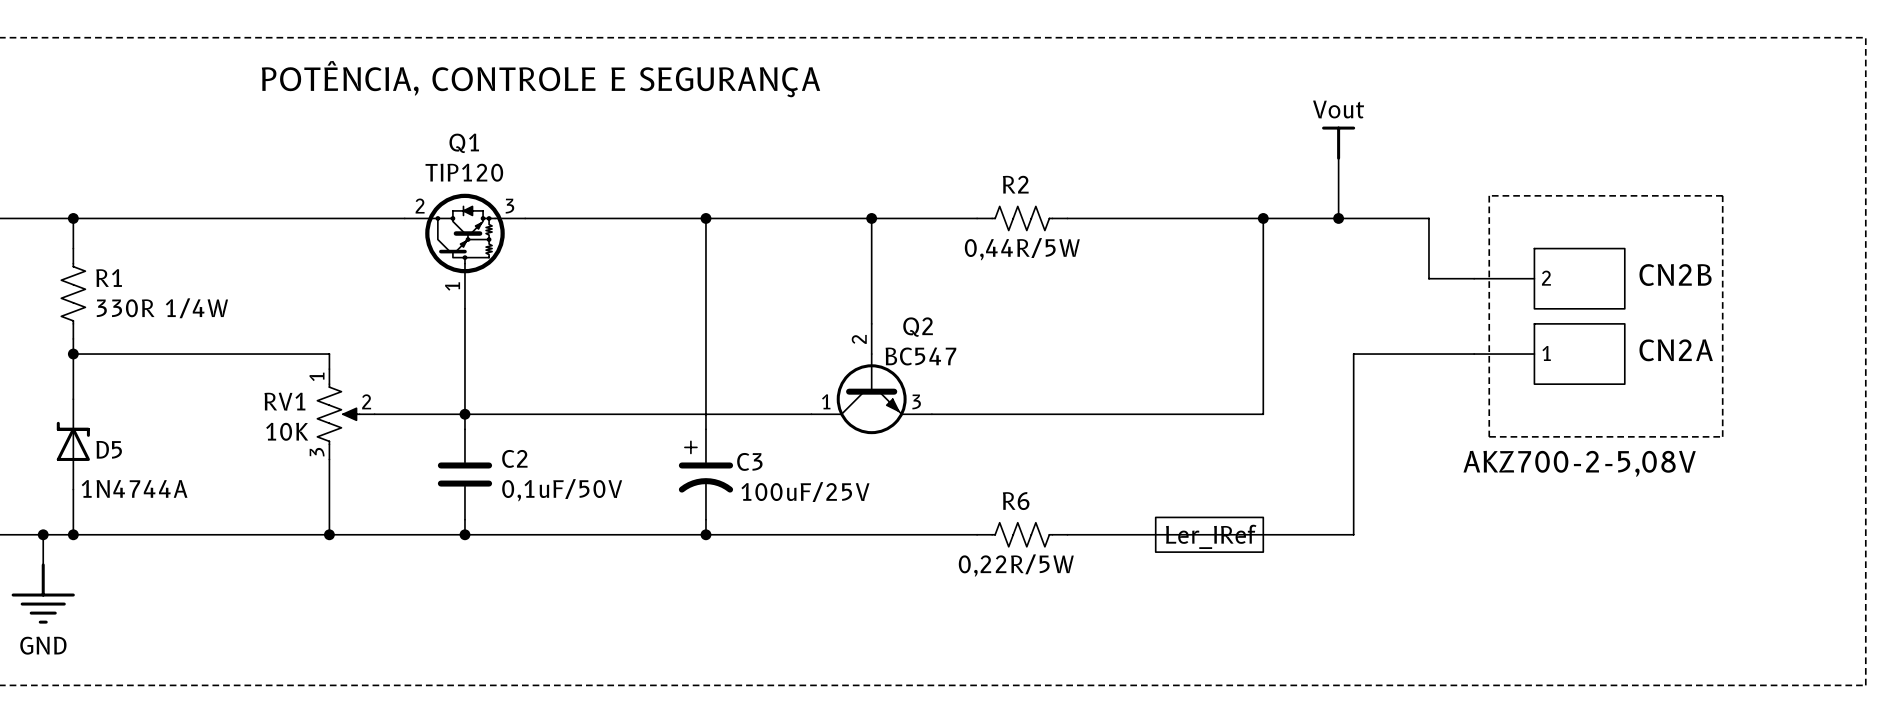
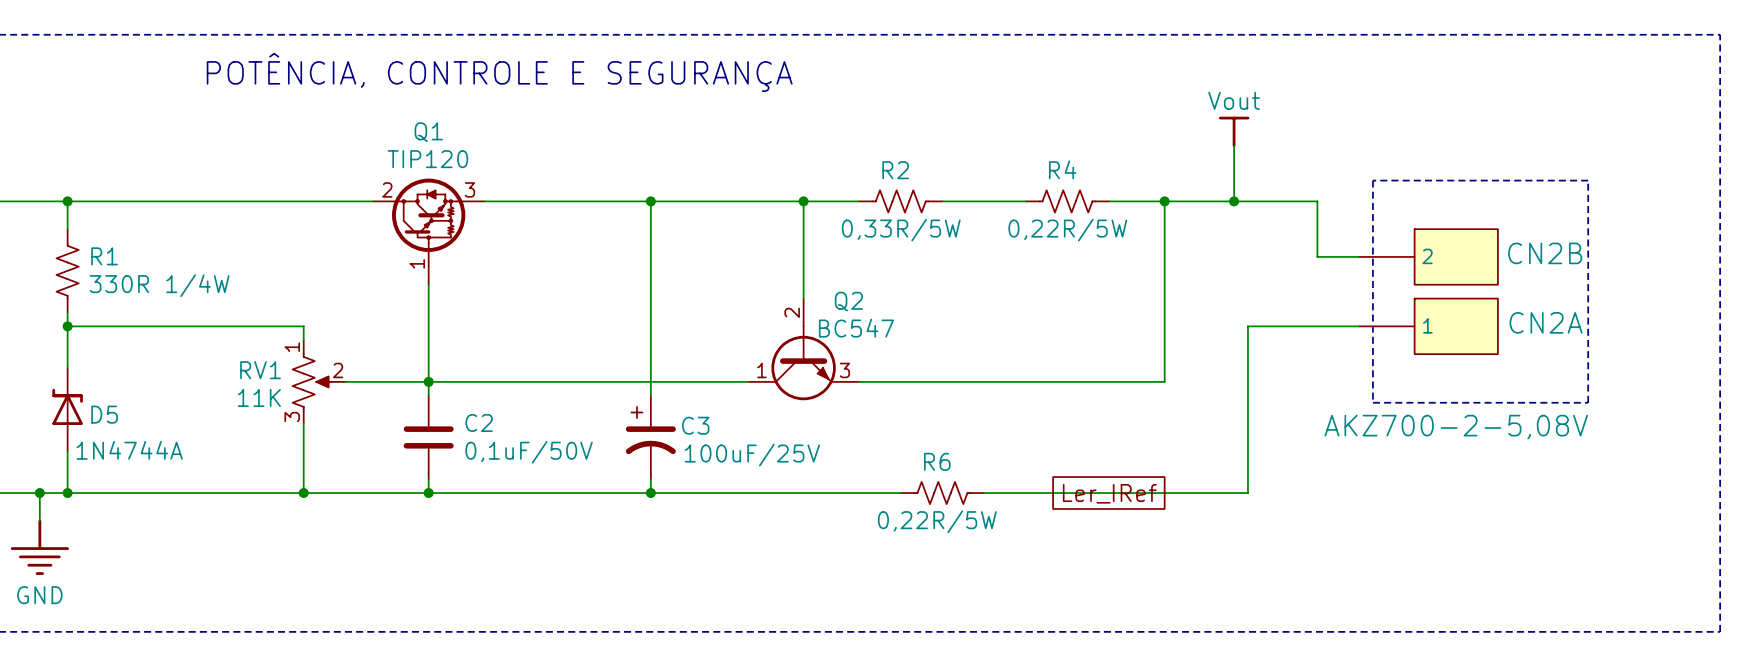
R2 position: (1022, 218) -> (900, 201)
R4: none -> 0,22R/5W (1067, 201)
R2 value: 0,44R/5W (1022, 249) -> 0,33R/5W (901, 230)
RV1 value: 10K (287, 431) -> 11K (259, 397)

